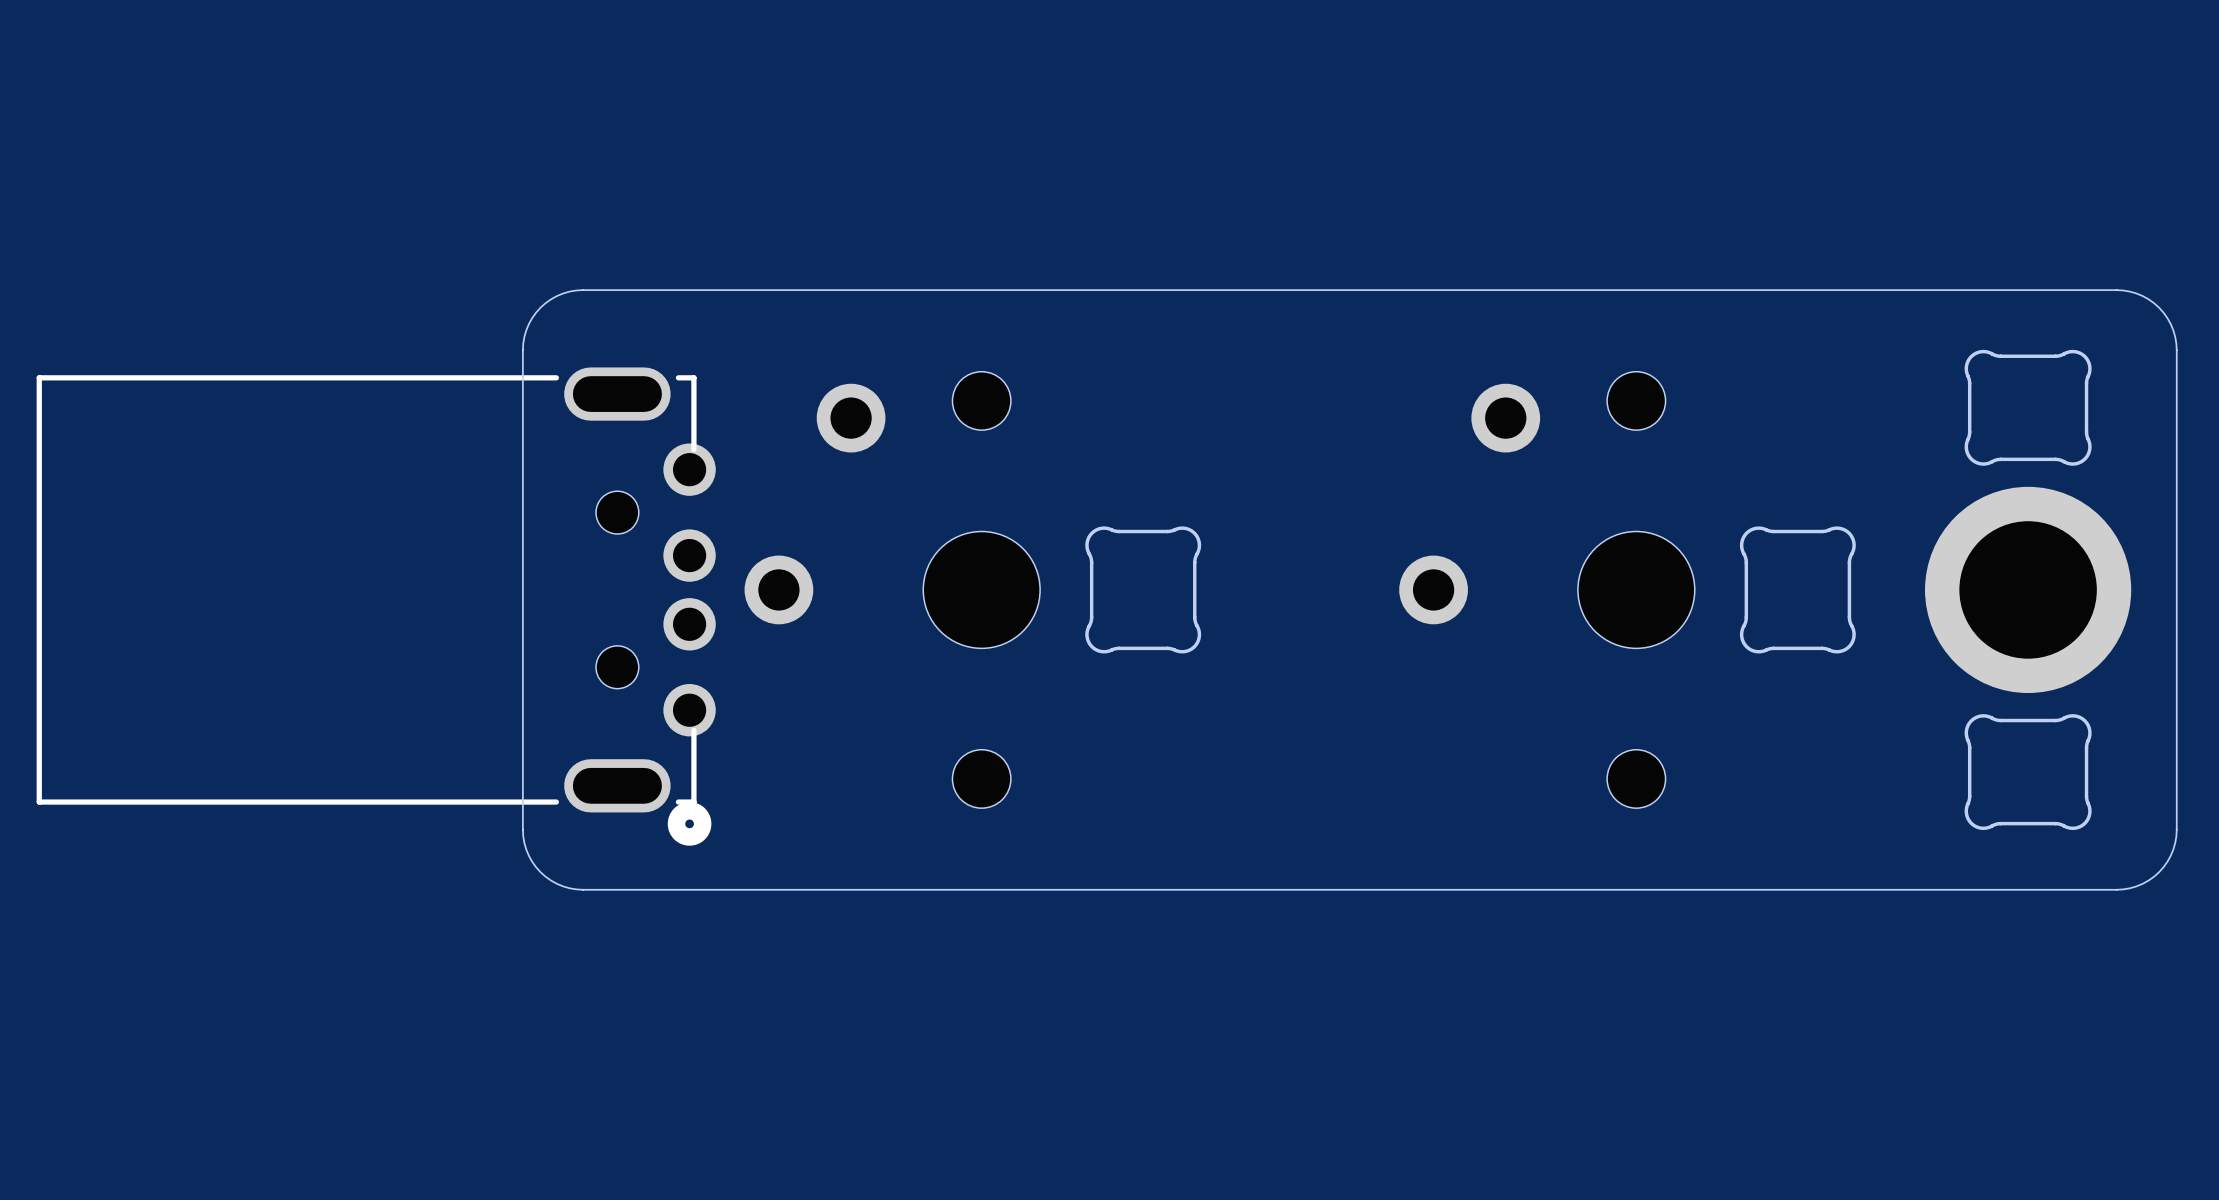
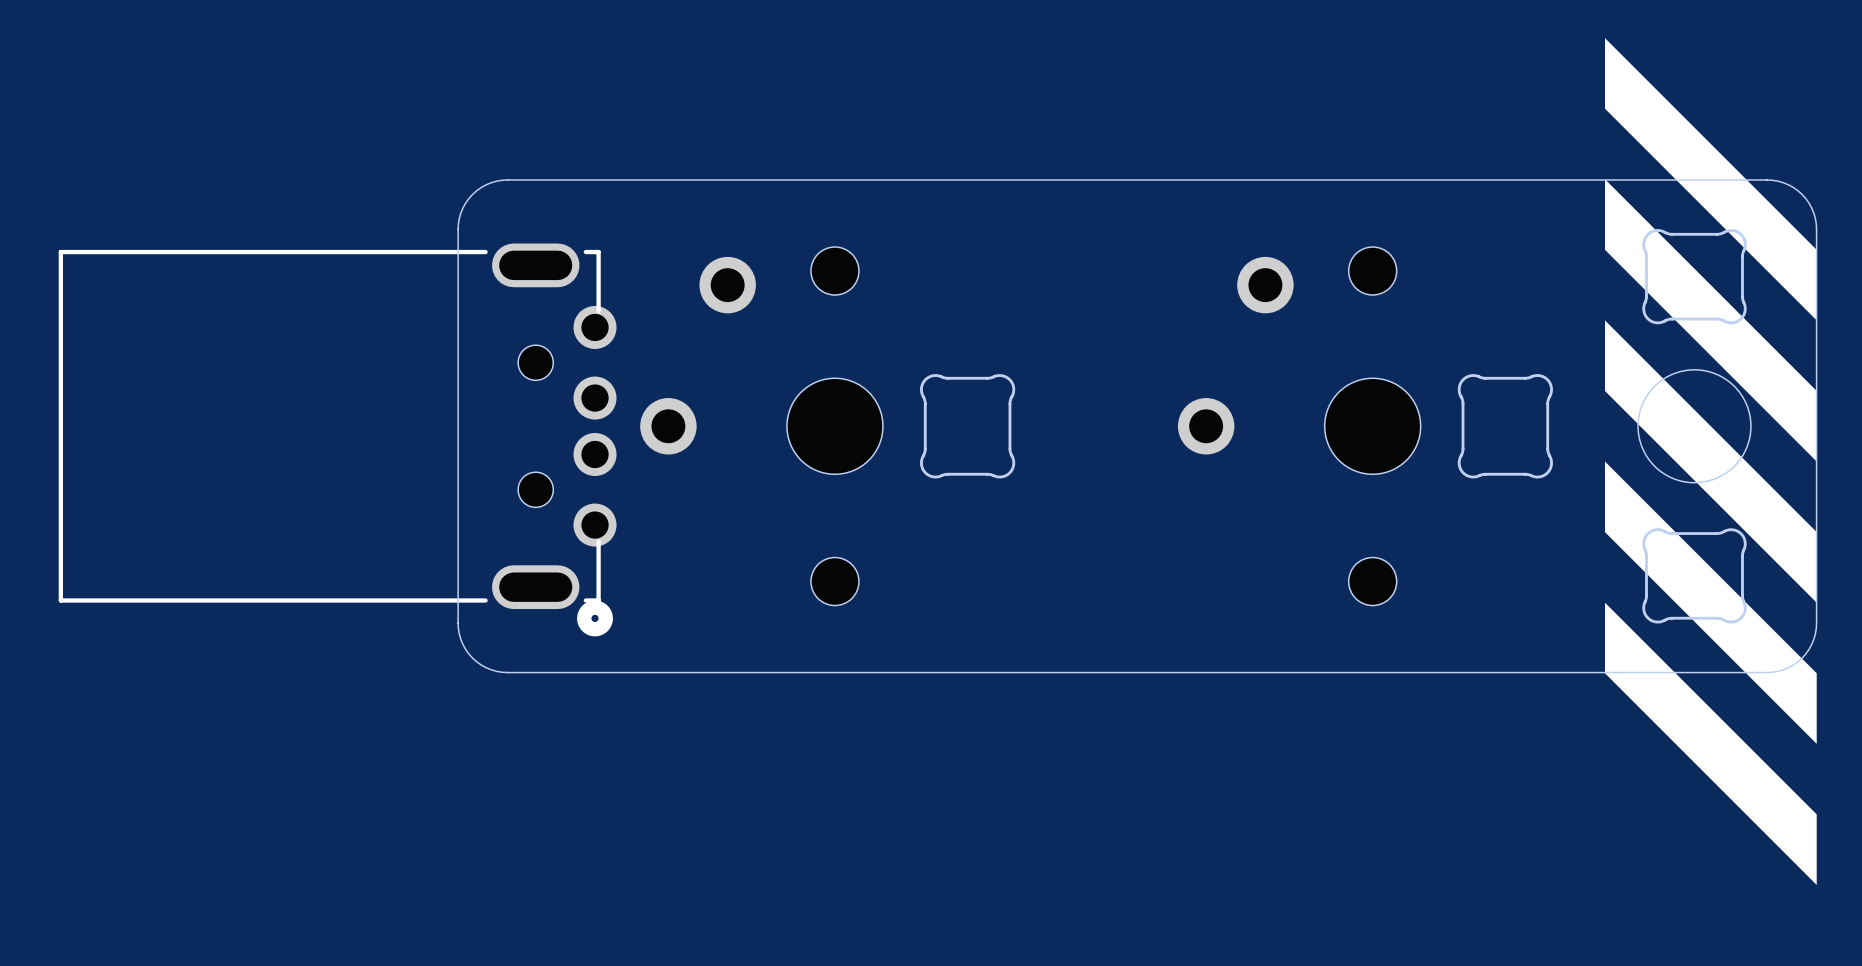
drawing: none -> [1605, 38, 1817, 885]
round board edge: none -> [1637, 369, 1752, 484]
part: (2028, 589) -> none

